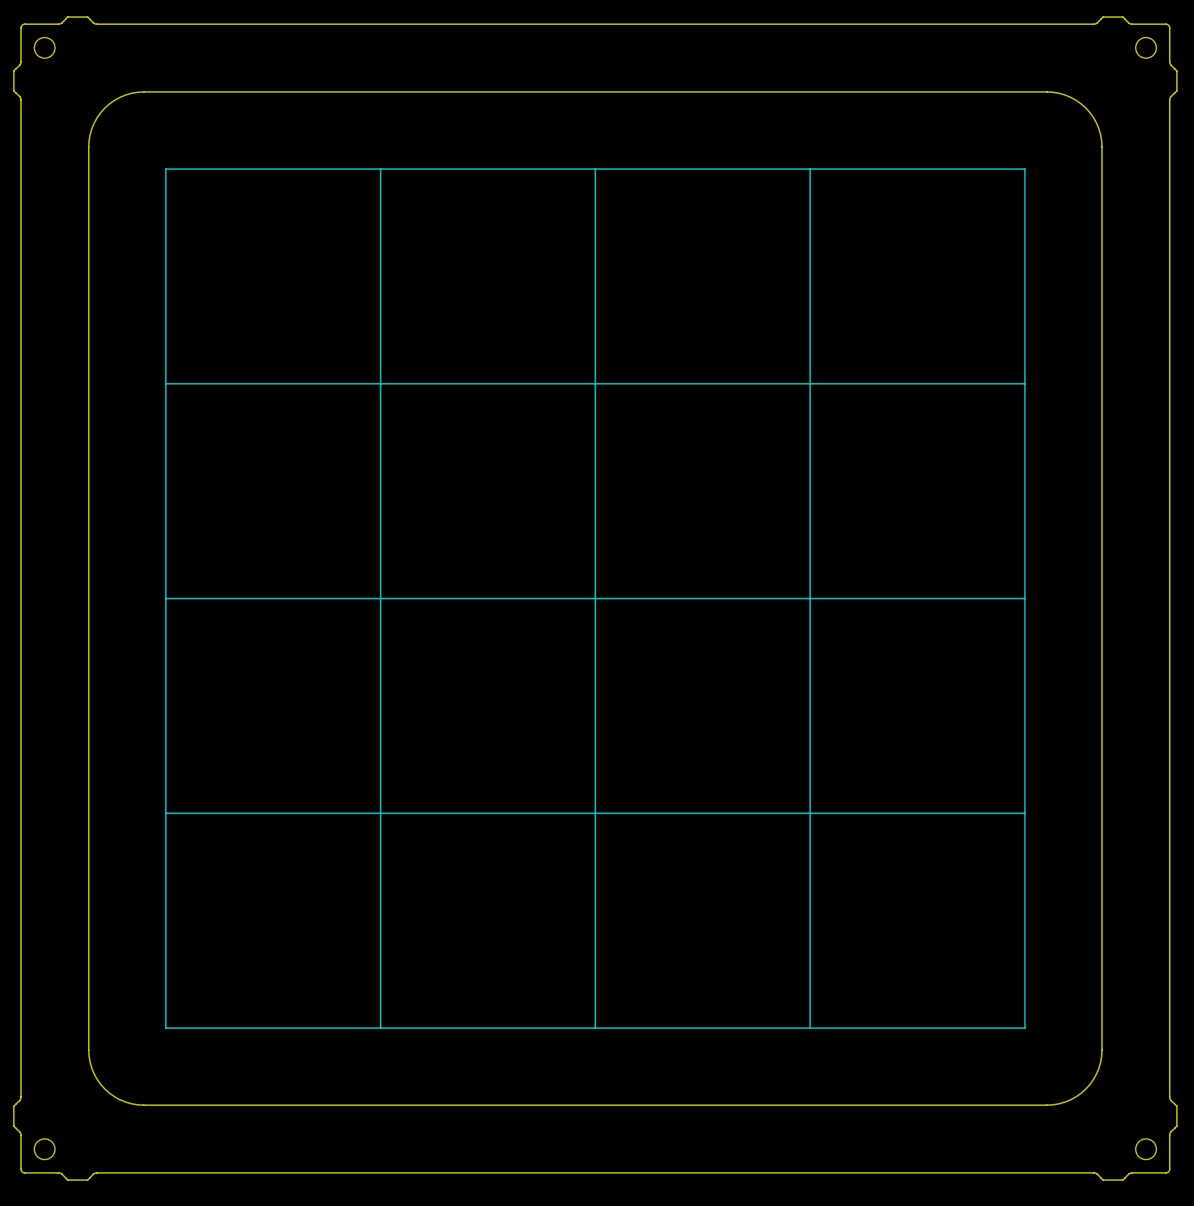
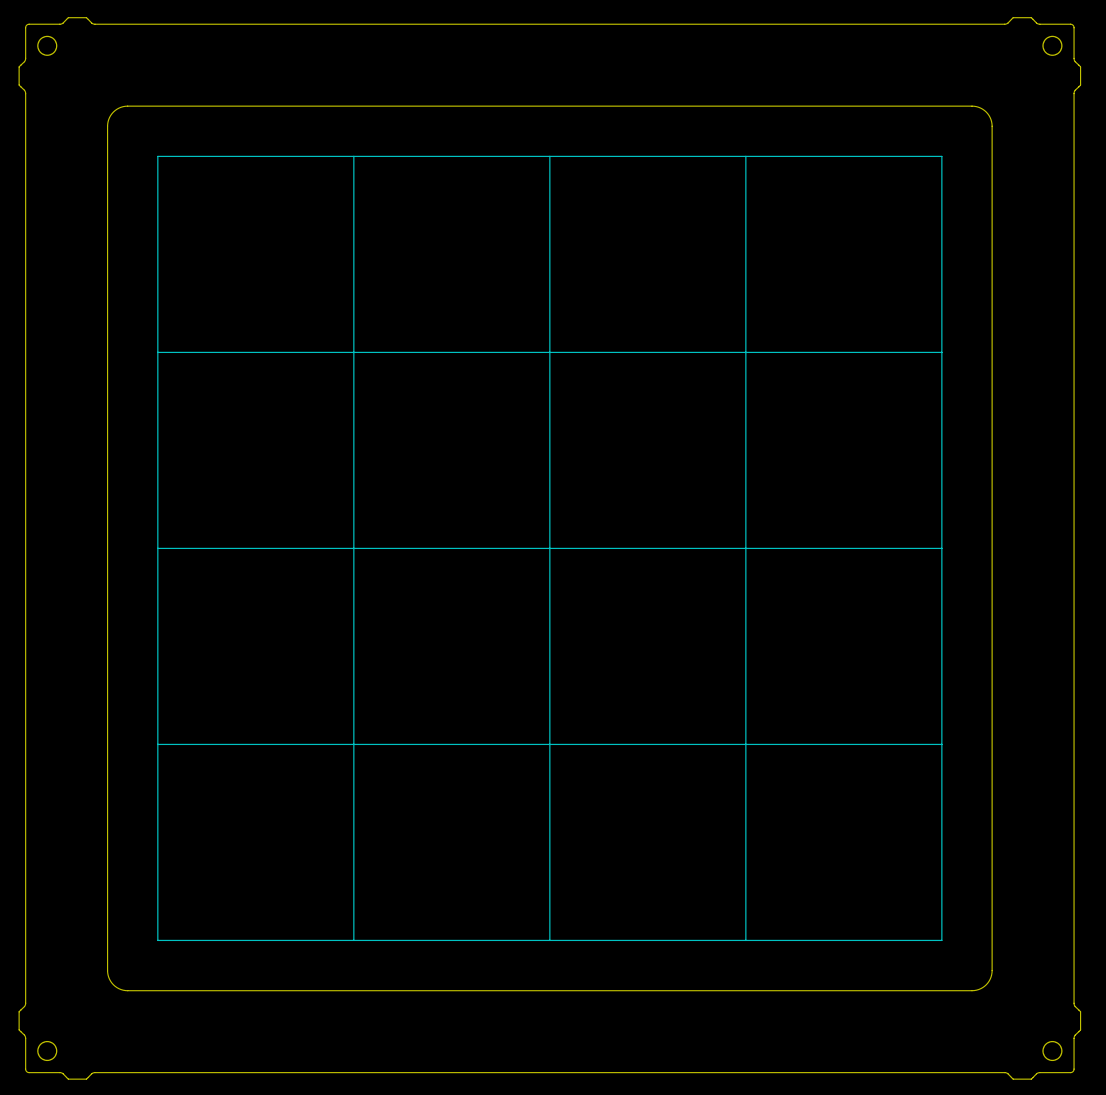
board edge: (143, 91) (1046, 91) (1070, 97) (1085, 108) (1098, 128) (1101, 146) (1101, 1050) (1096, 1074) (1085, 1089) (1070, 1099) (1046, 1105) (143, 1105) (119, 1099) (104, 1089) (91, 1068) (88, 1050) (88, 146) (94, 123) (104, 108) (125, 95) (143, 91) -> (127, 106) (113, 112) (107, 126) (107, 970) (113, 984) (127, 990) (972, 990) (986, 984) (992, 970) (992, 126) (986, 112) (972, 106) (127, 106)

